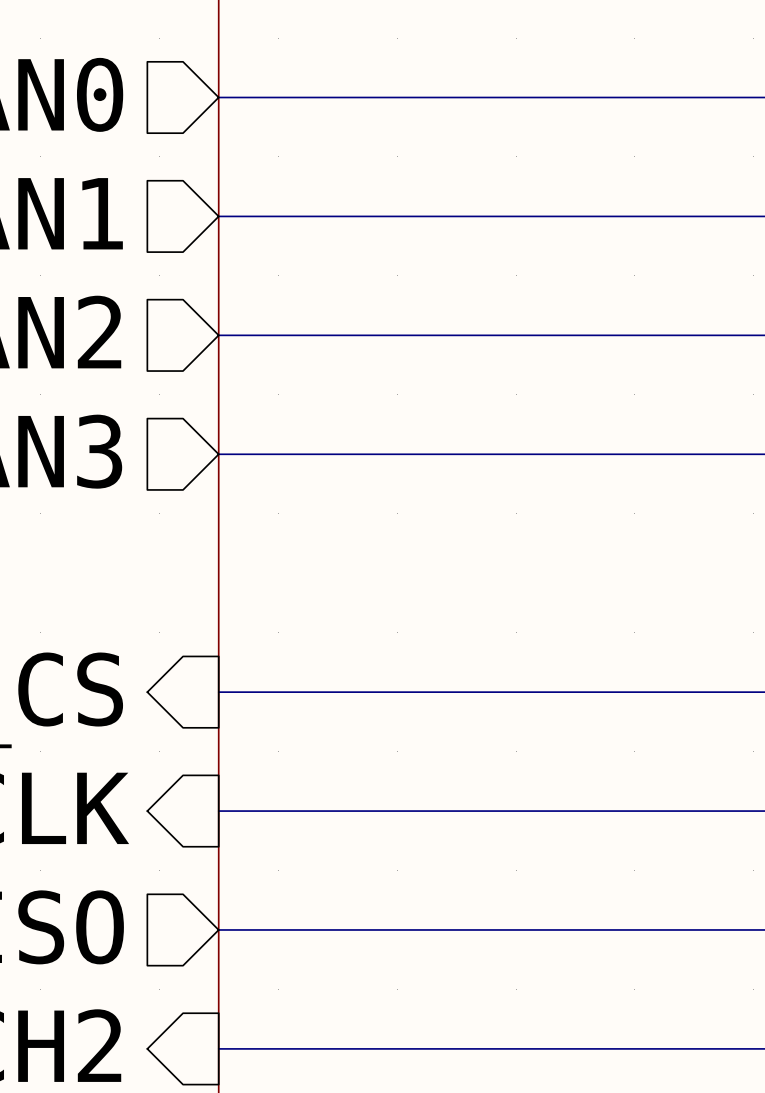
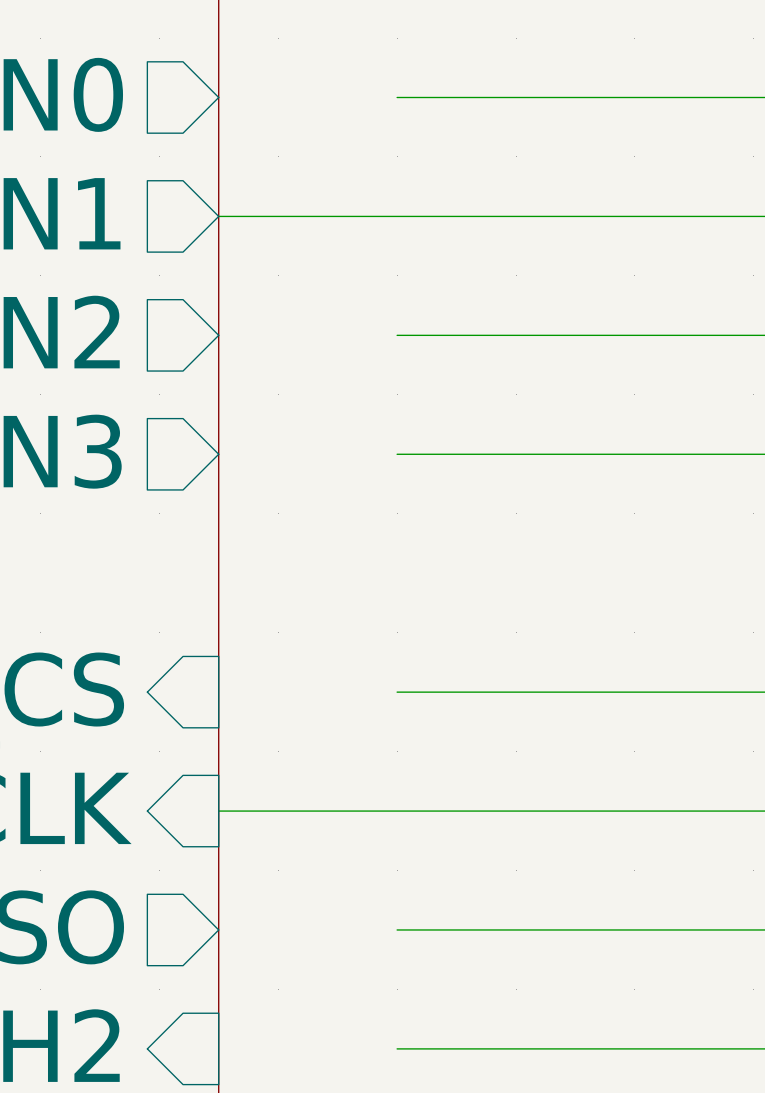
wire: (218, 97) (397, 97) -> none
wire: (218, 335) (397, 335) -> none
wire: (218, 454) (397, 454) -> none
wire: (218, 692) (397, 692) -> none
wire: (218, 929) (397, 929) -> none
wire: (218, 1048) (397, 1048) -> none

